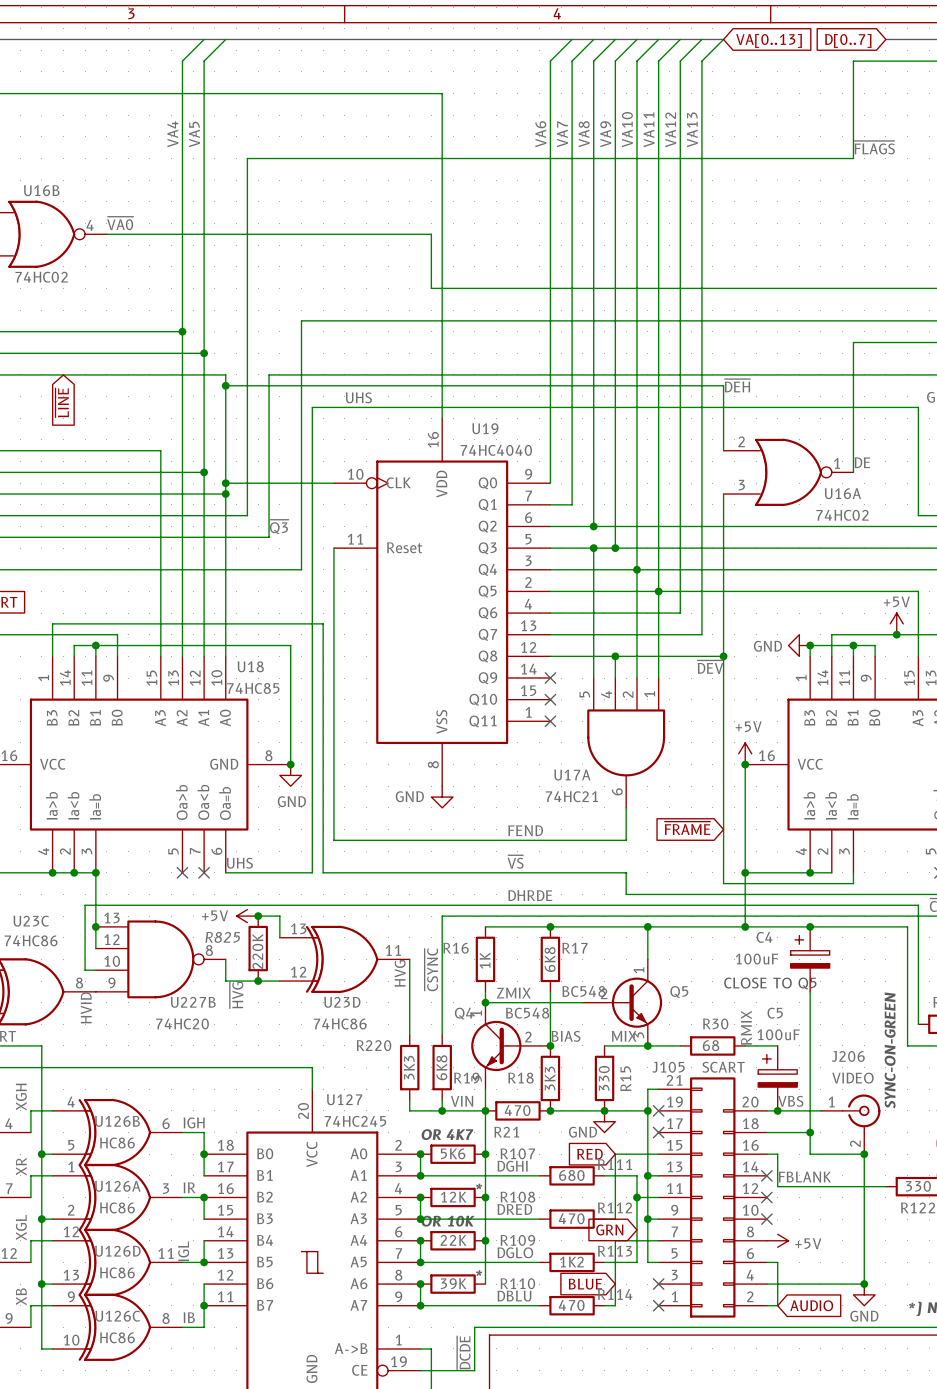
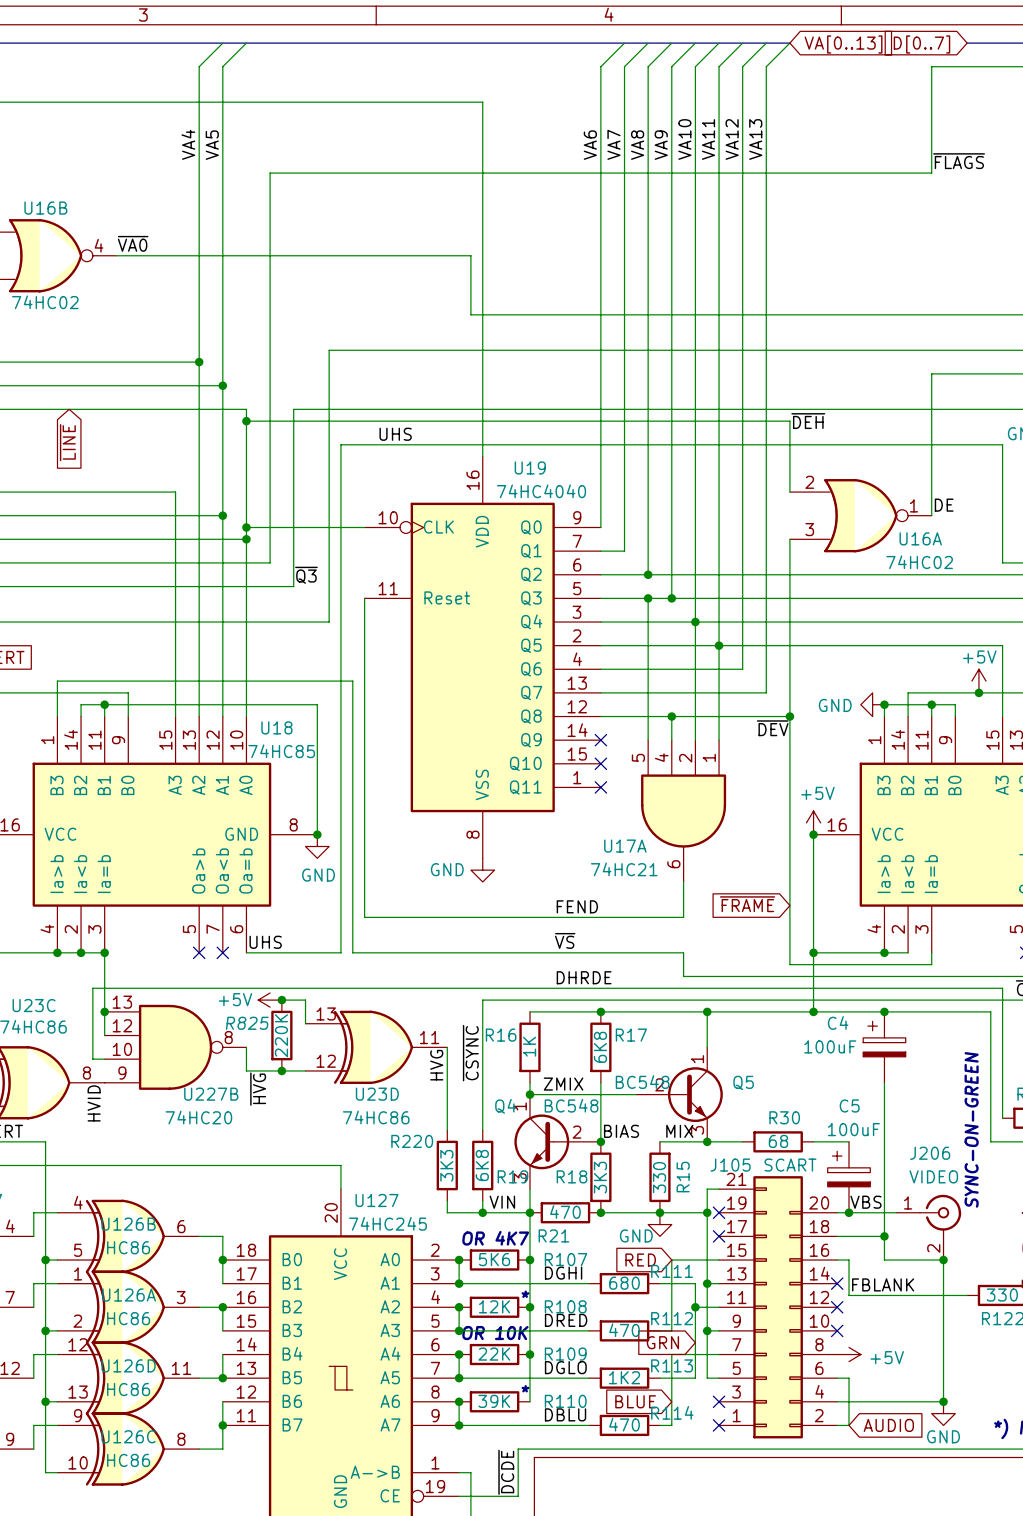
text: CLOSE TO Q5 (770, 983) -> none
label: RMIX (746, 1027) -> none
label: XGH (21, 1097) -> none
label: IGH (194, 1122) -> none
label: XR (21, 1166) -> none
label: IR (189, 1187) -> none
label: XGL (21, 1227) -> none
label: IGL (183, 1251) -> none
label: XB (21, 1296) -> none
label: IB (189, 1317) -> none

